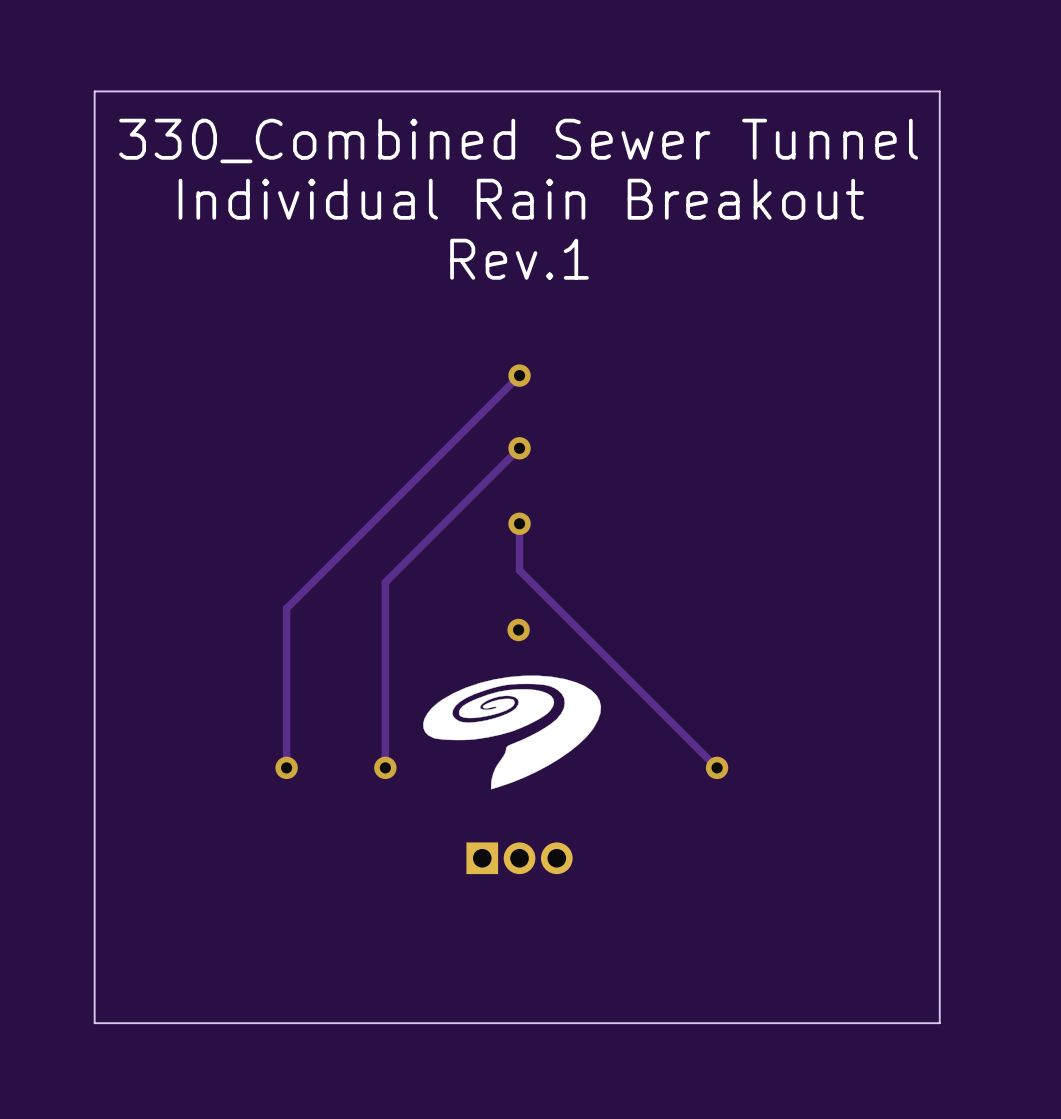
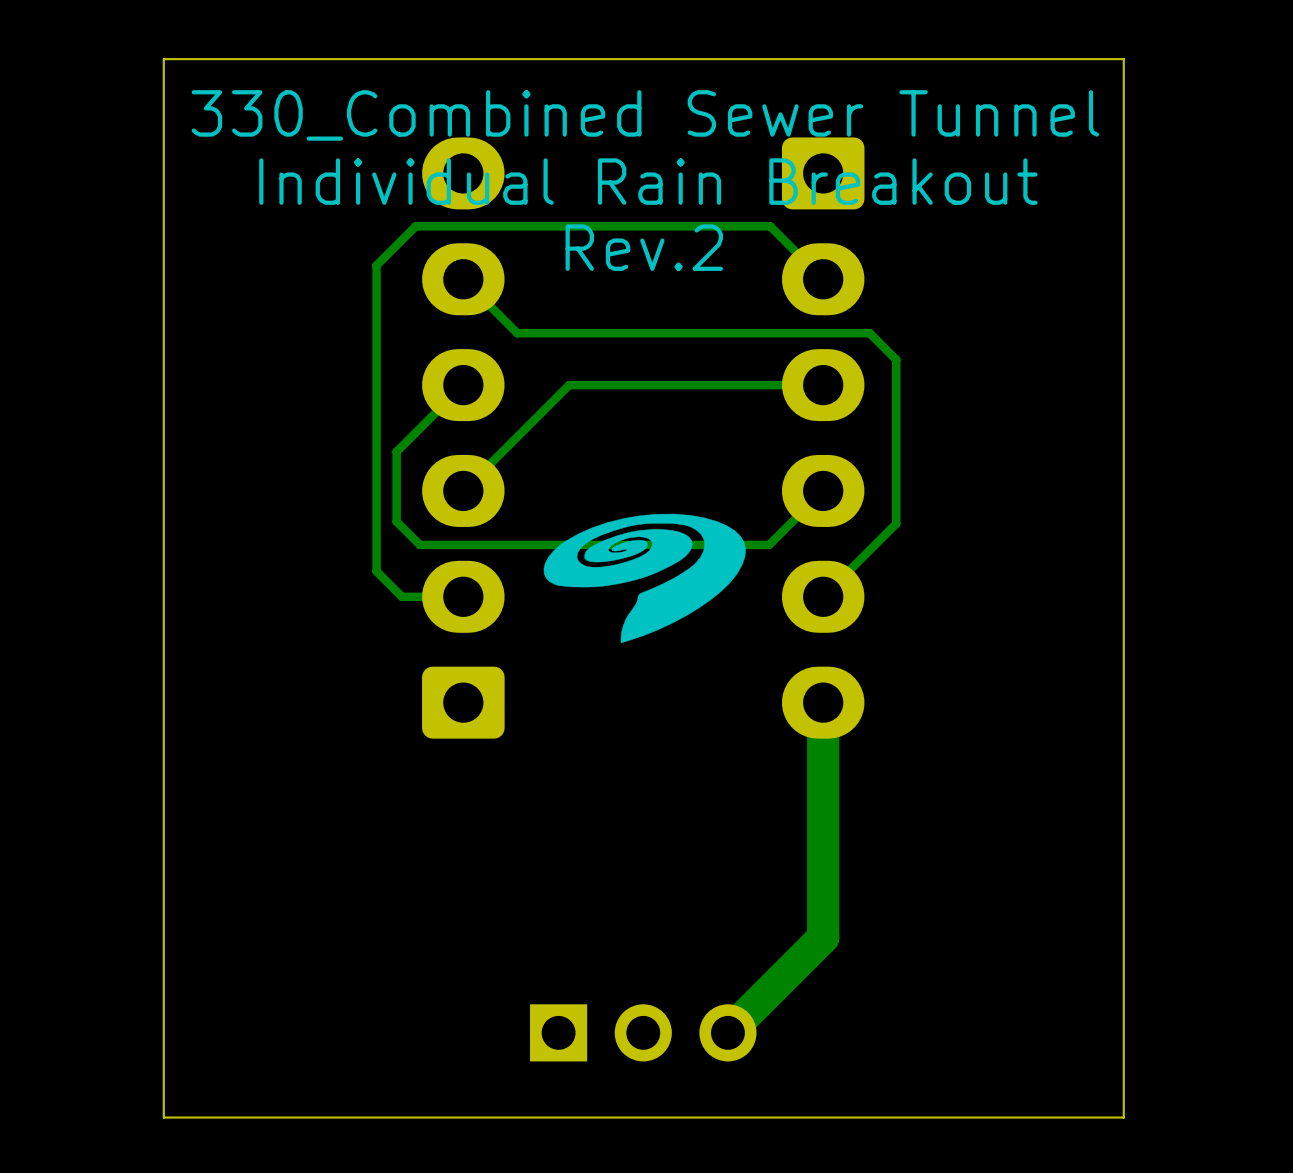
text: Rev.1 (519, 259) -> Rev.2 (644, 247)
track: none -> (463, 279) (517, 333) (869, 333) (896, 359) (896, 523) (823, 596)
track: none -> (823, 279) (770, 226) (415, 226) (376, 265) (376, 571) (401, 596) (463, 596)
track: (519, 375) (286, 608) (286, 767) -> none
via: (519, 375) -> none
track: none -> (463, 385) (396, 451) (396, 521) (419, 544) (769, 544) (823, 490)
track: none -> (823, 385) (569, 385) (463, 490)
part: none -> (463, 438)
part: none -> (823, 438)
track: (519, 448) (385, 582) (385, 767) -> none
via: (519, 448) -> none
track: (519, 523) (519, 570) (717, 767) -> none
via: (519, 523) -> none
via: (518, 629) -> none
track: none -> (823, 702) (823, 937) (727, 1032)
drawing position: (512, 732) -> (644, 578)
via: (286, 767) -> none
via: (385, 767) -> none
via: (717, 767) -> none
part: (519, 858) -> none
part: none -> (643, 1032)

